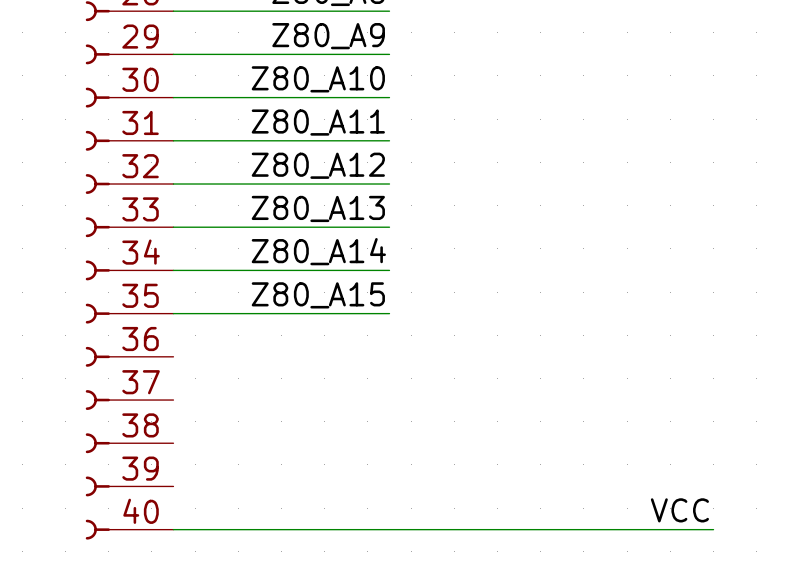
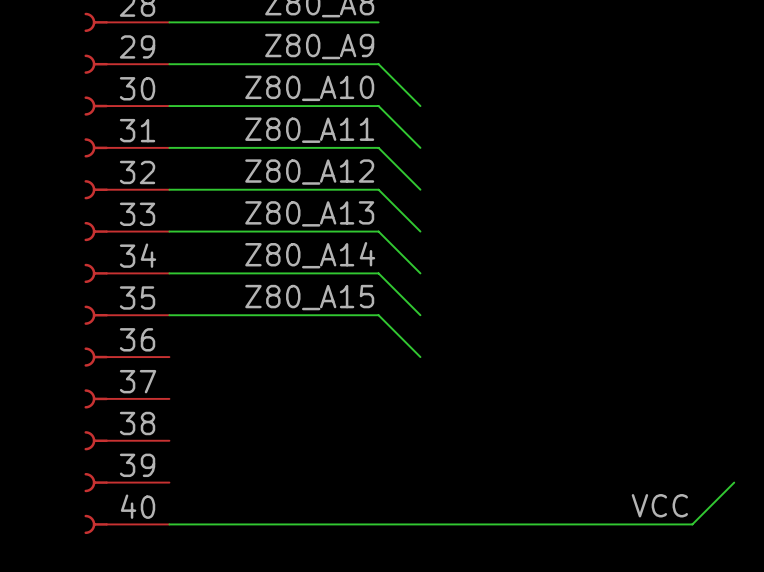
wire: none -> (378, 64) (420, 106)
wire: none -> (378, 106) (420, 147)
wire: none -> (378, 147) (420, 189)
wire: none -> (378, 189) (420, 231)
wire: none -> (378, 231) (420, 273)
wire: none -> (378, 273) (420, 315)
wire: none -> (378, 315) (420, 357)
wire: none -> (734, 482) (692, 524)

